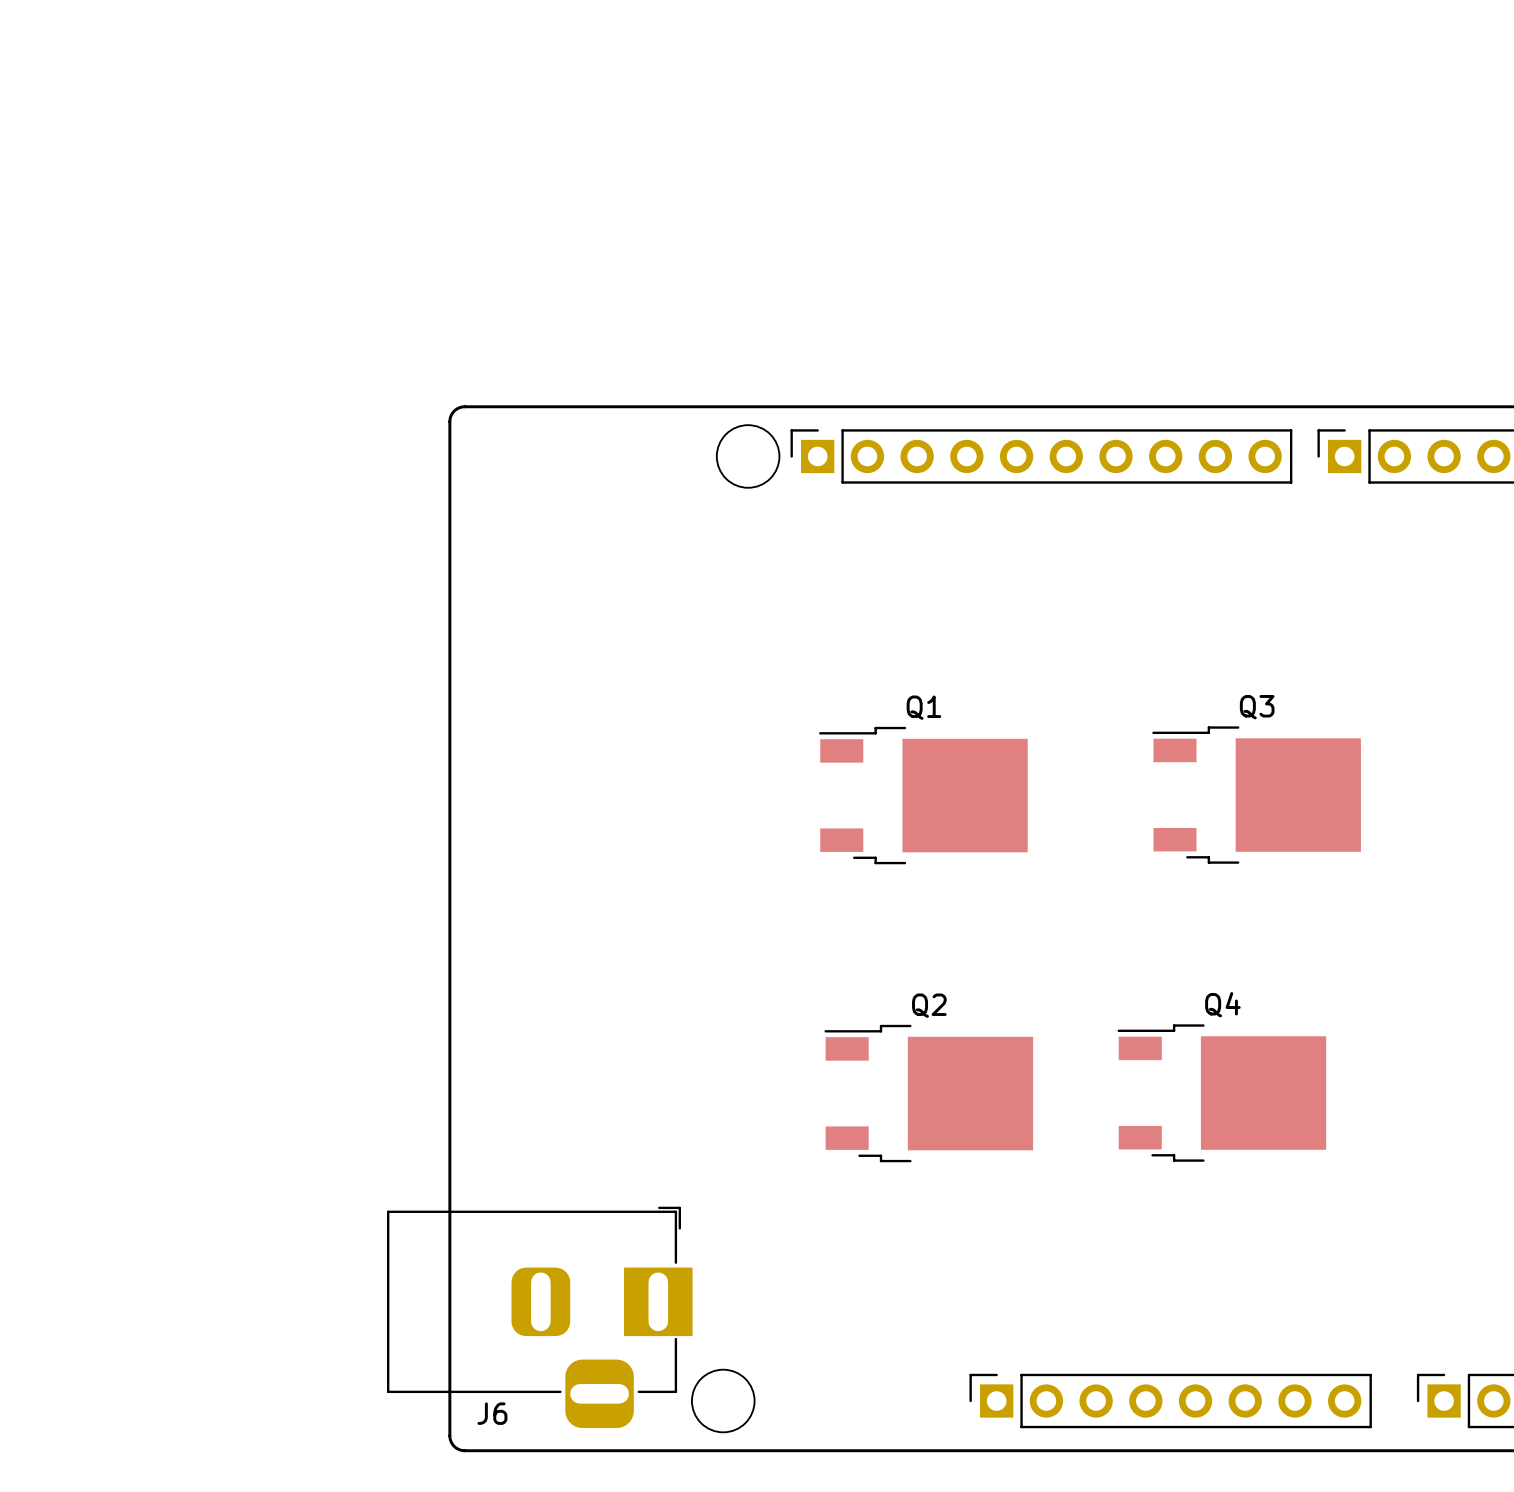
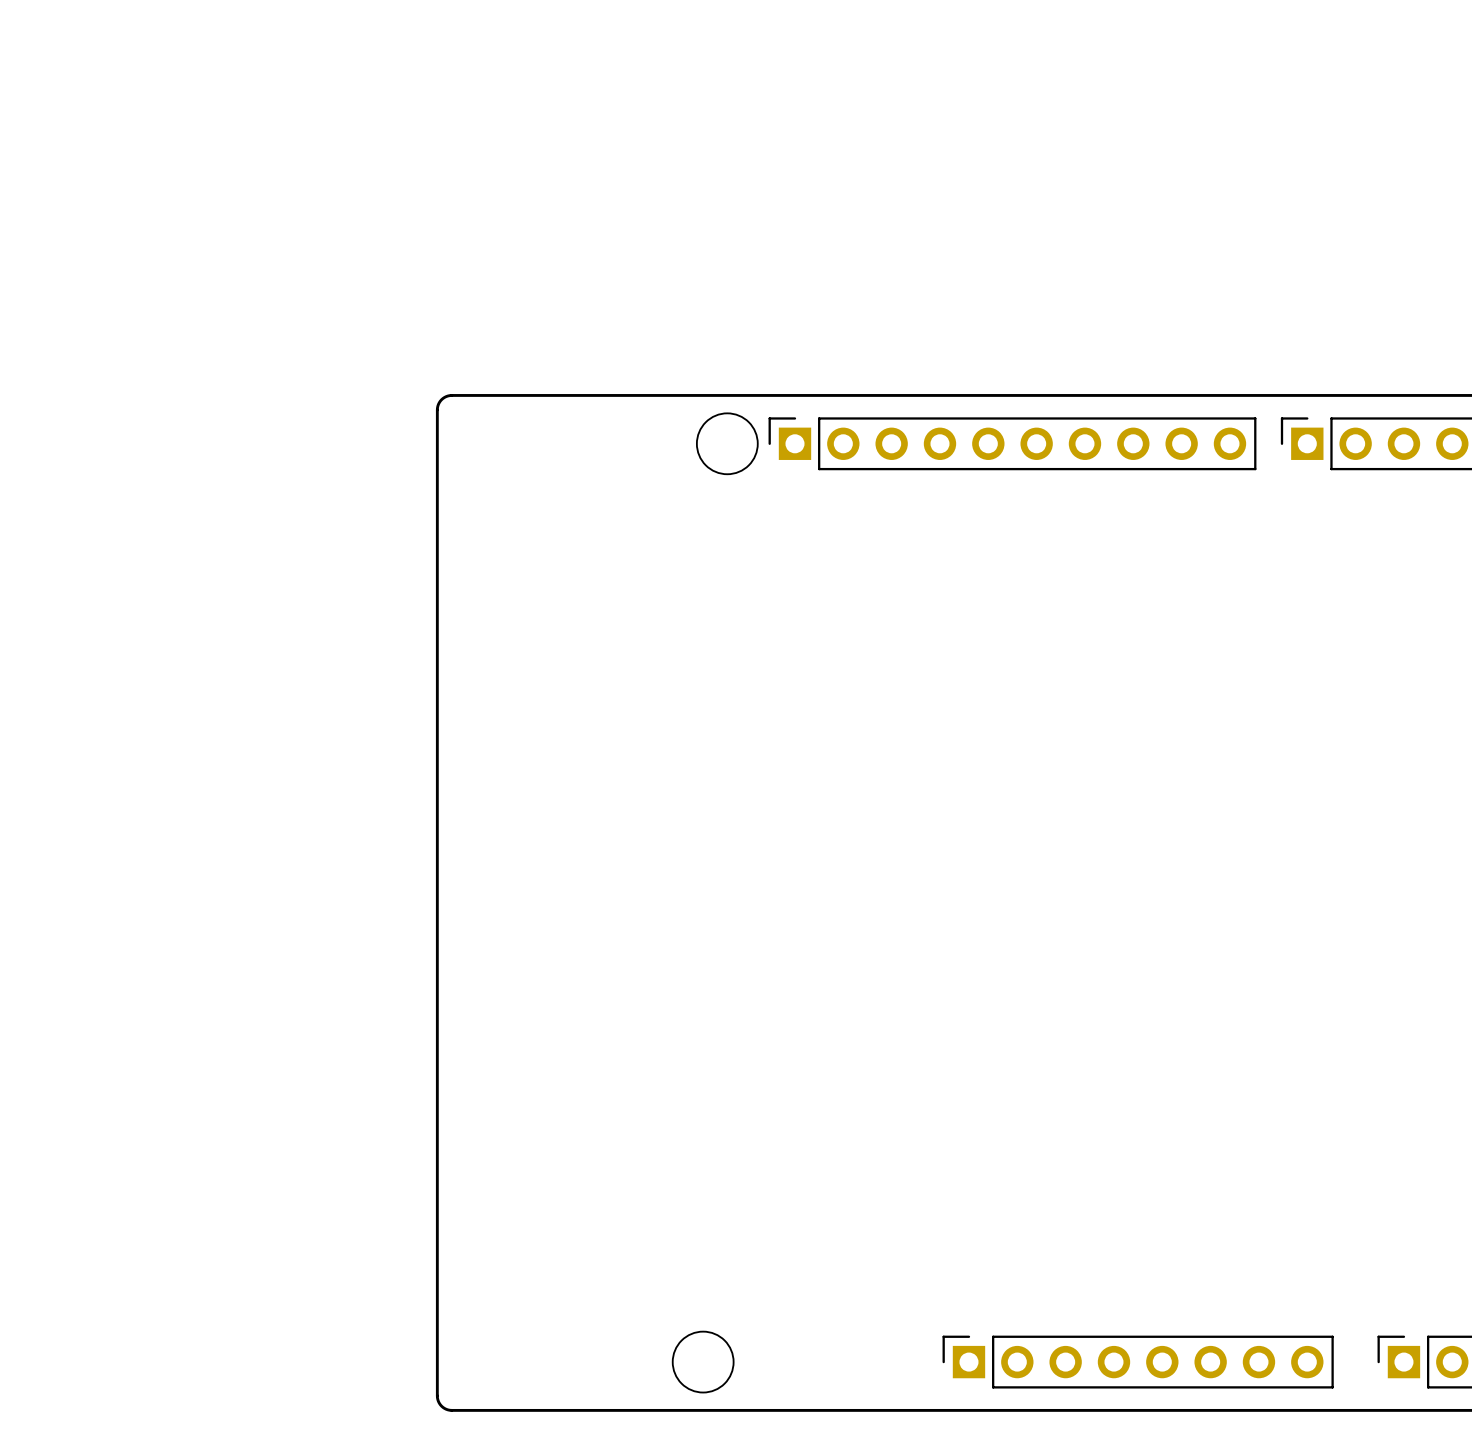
Q1: (923, 795) -> none
Q3: (1256, 795) -> none
Q2: (928, 1093) -> none
Q4: (1221, 1093) -> none
J6: (539, 1317) -> none

